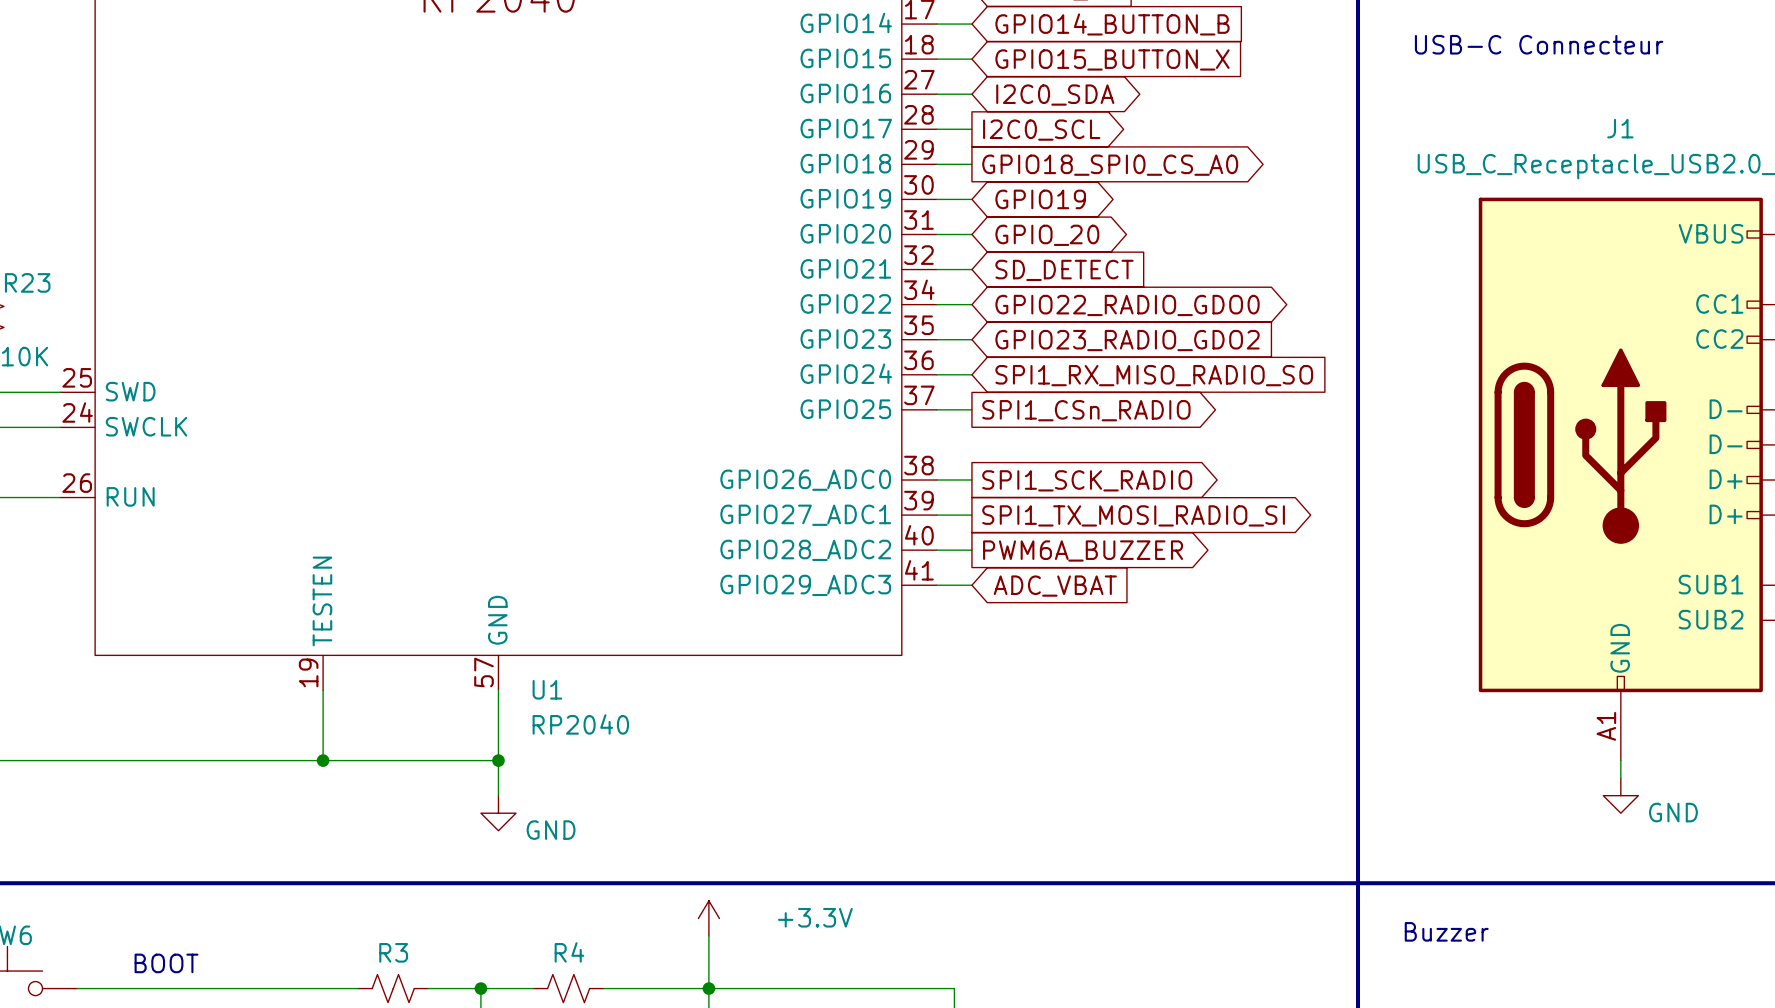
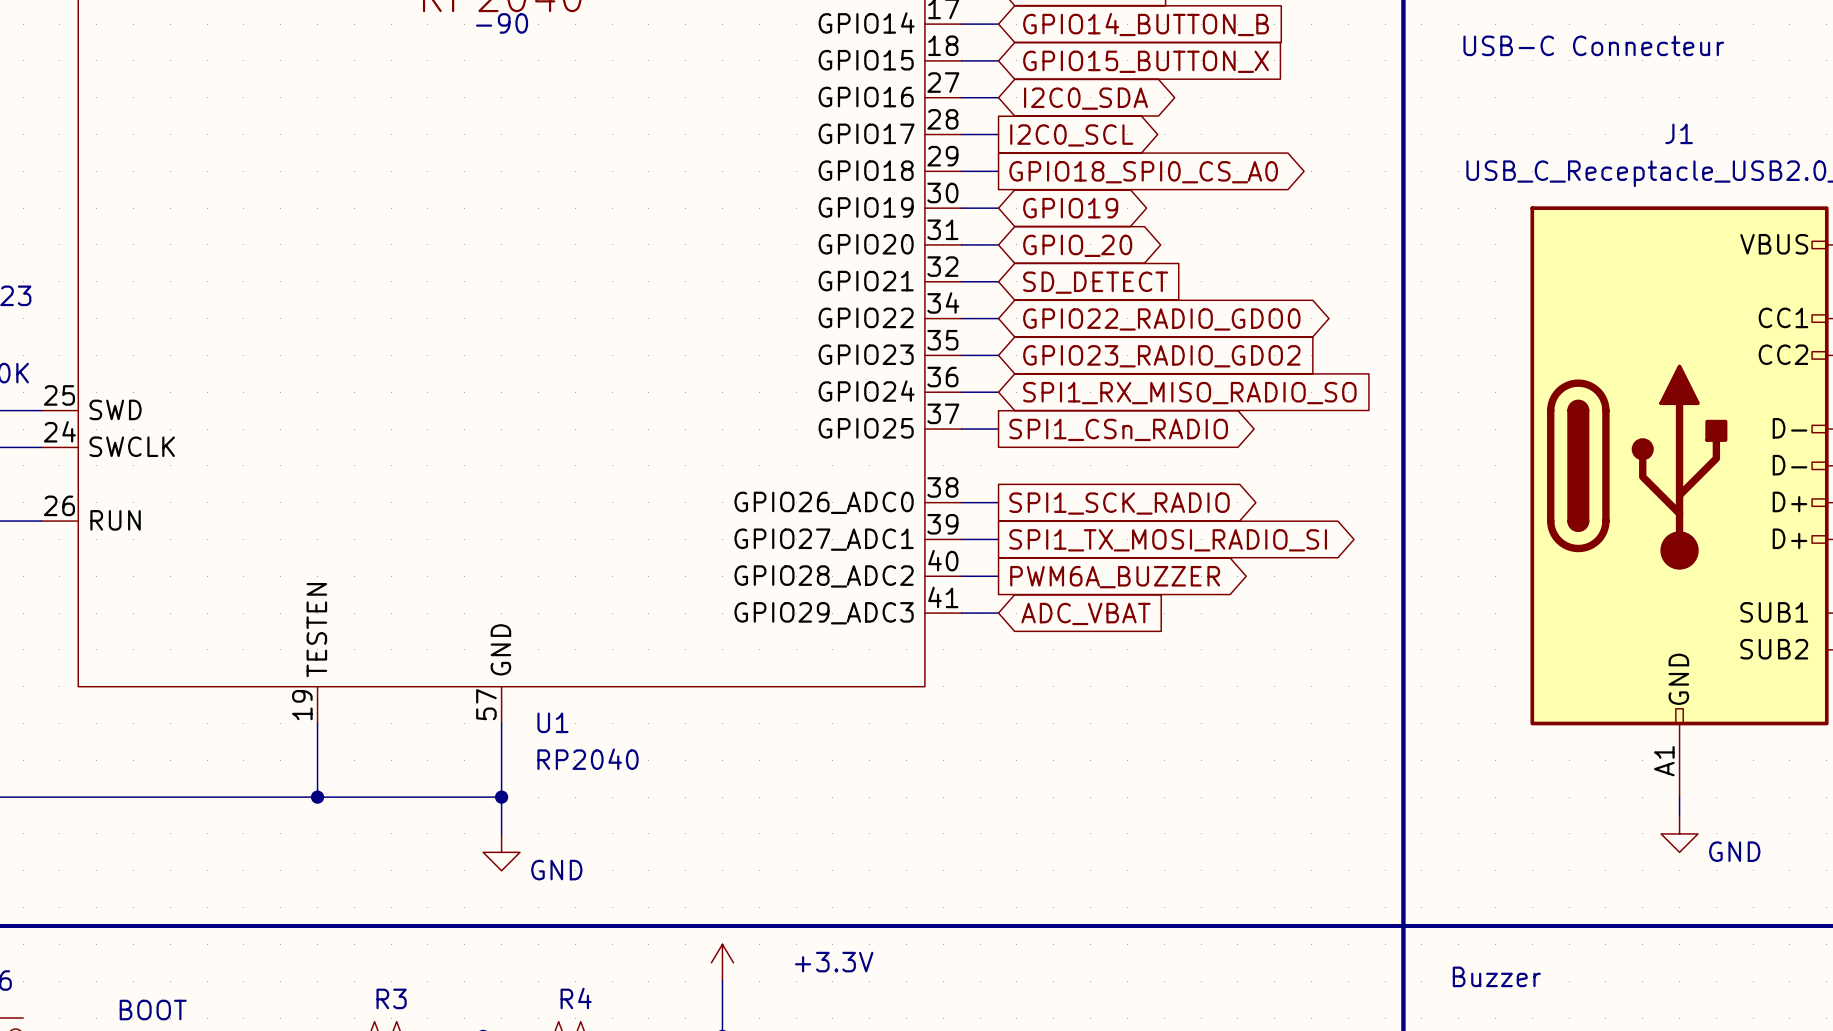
U1 text: none -> -90 (502, 23)

